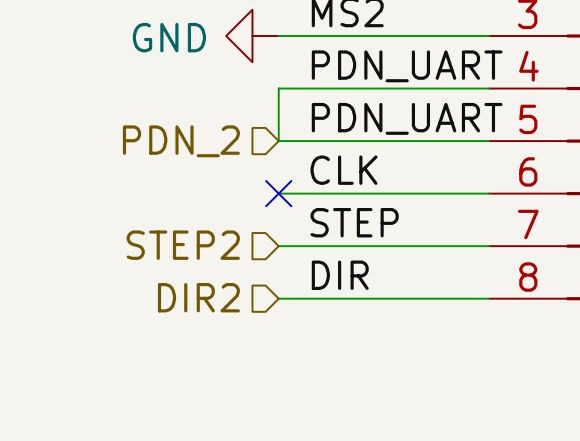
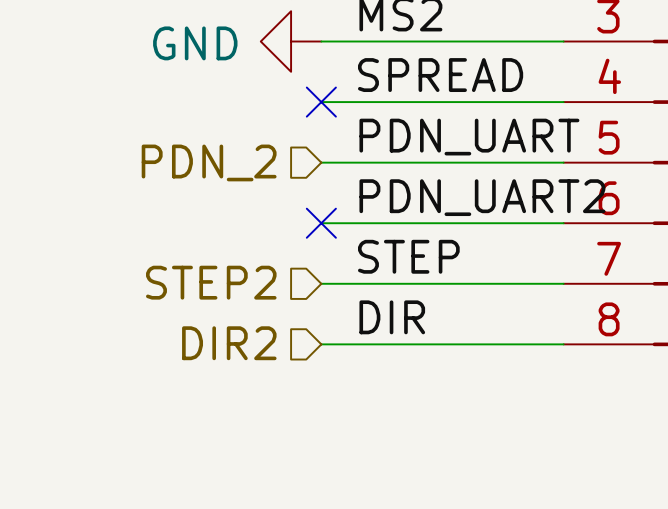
label: PDN_UART (407, 66) -> SPREAD (440, 75)
wire: (278, 88) (278, 141) -> none
no-connect mark: none -> (321, 102)
label: CLK (343, 170) -> PDN_UART2 (482, 197)

